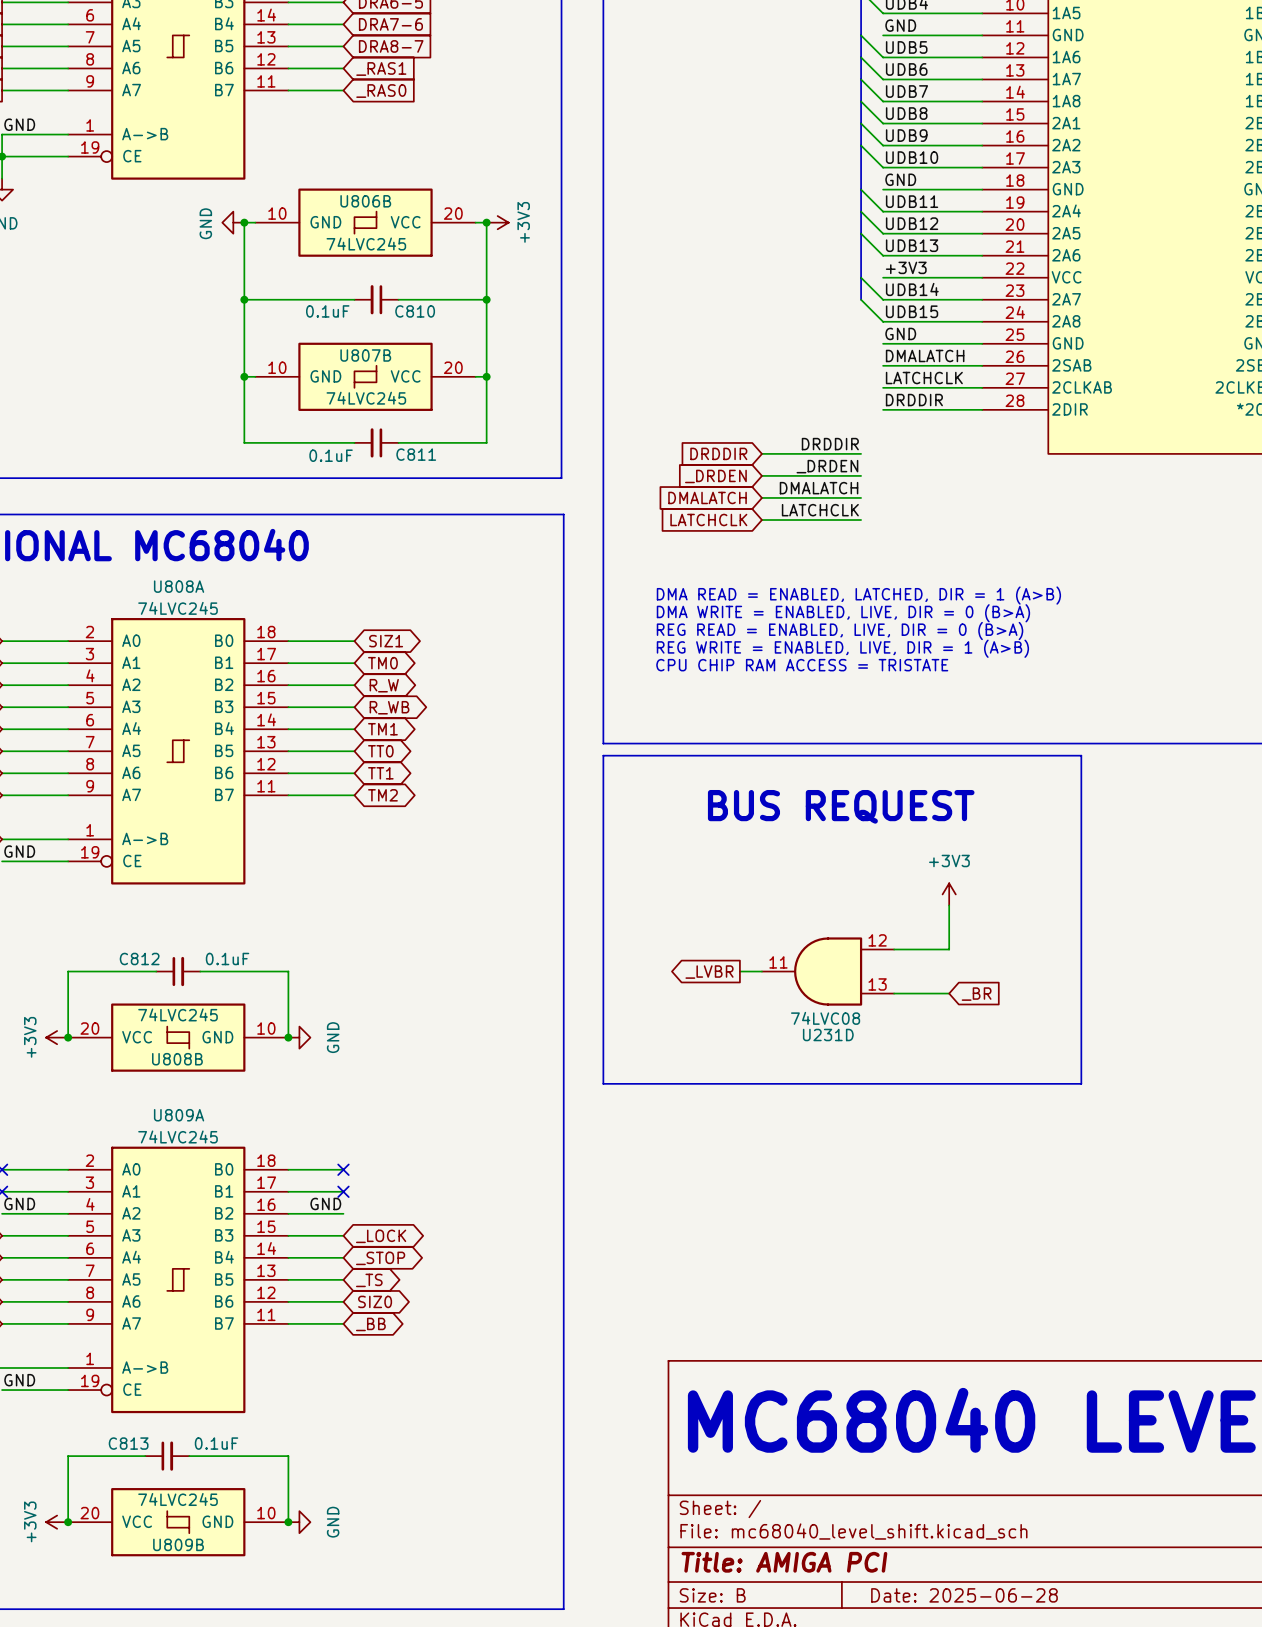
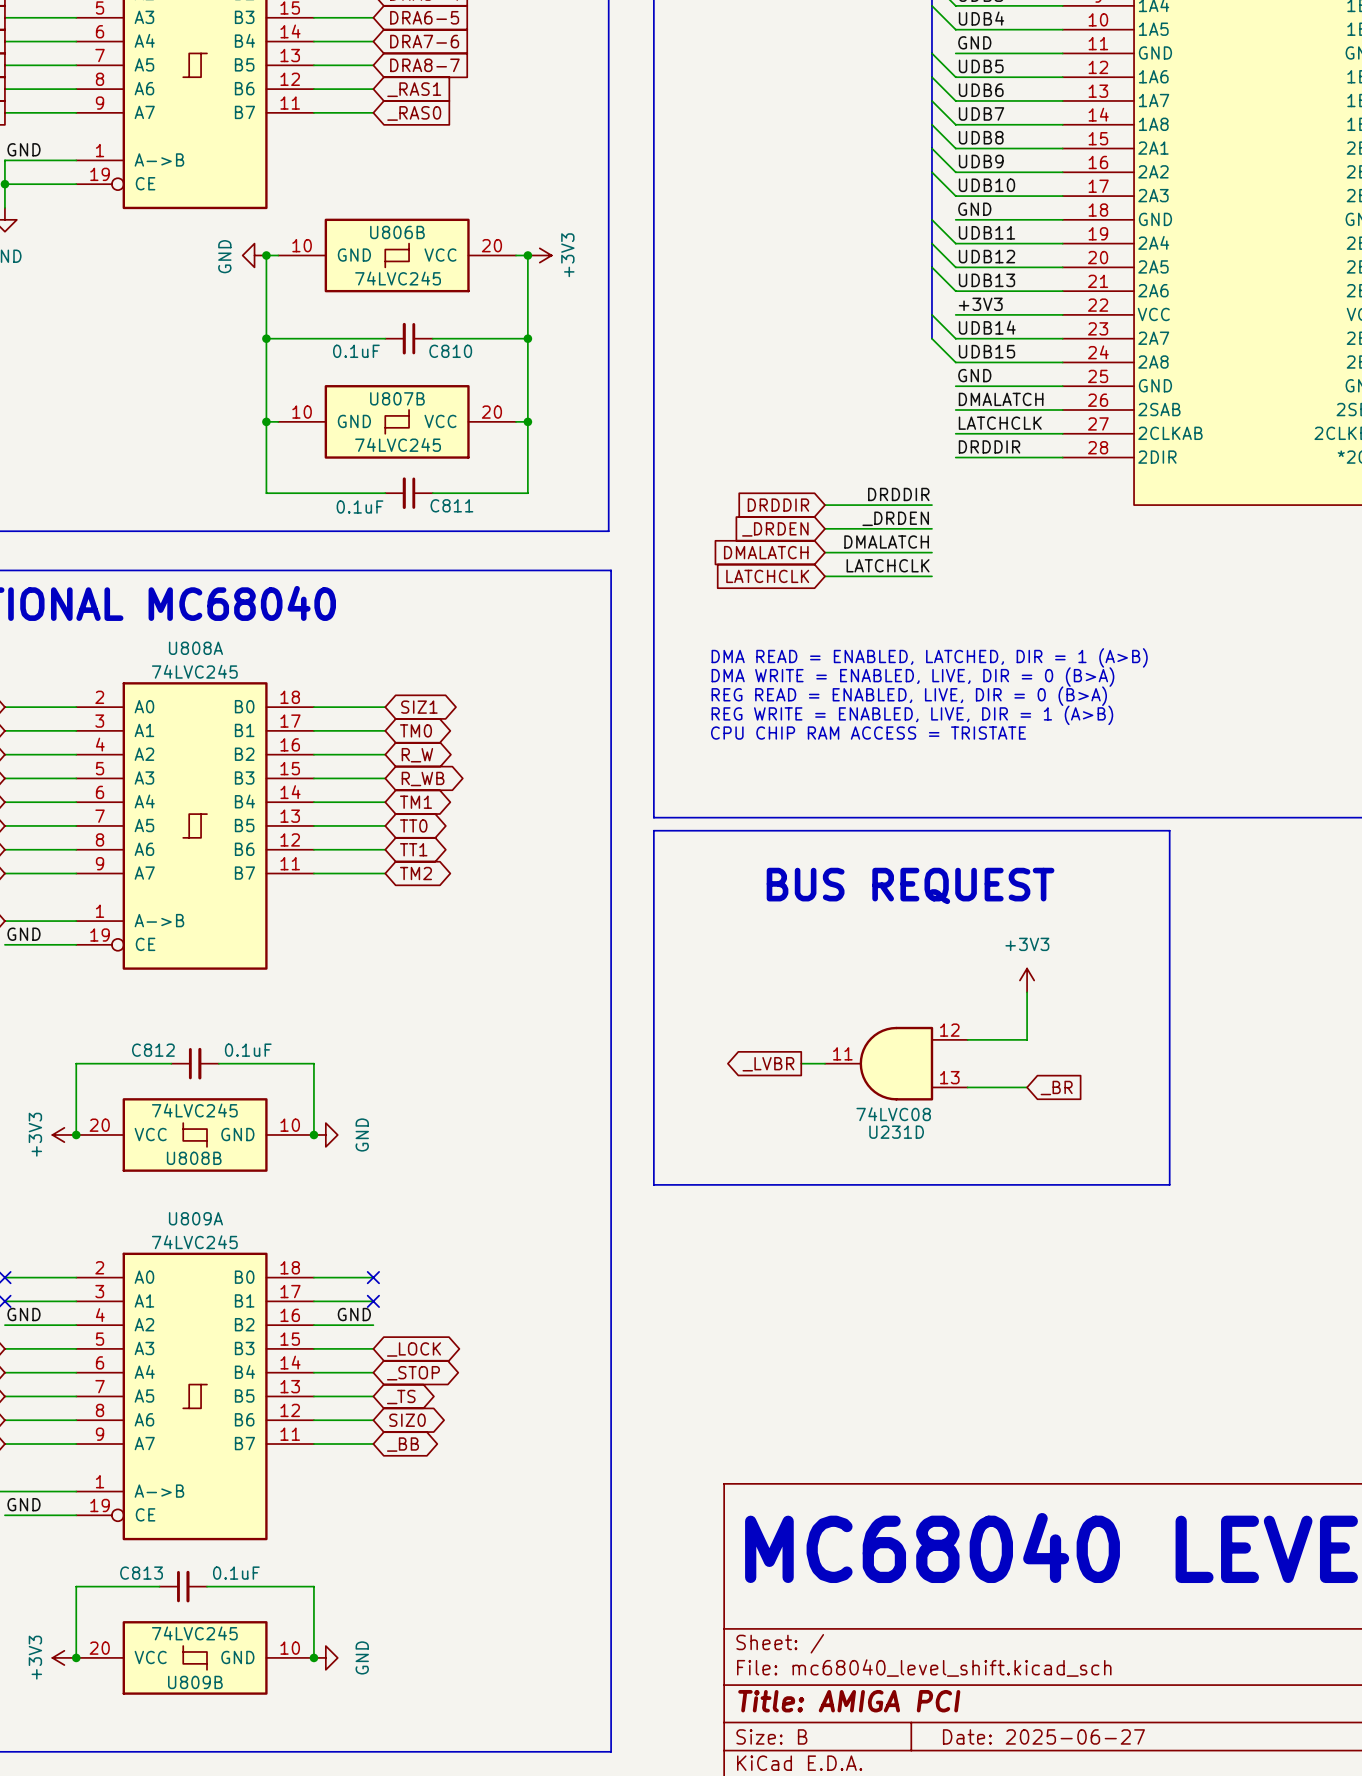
title block: Date: 2025-06-28 (964, 1595) -> Date: 2025-06-27 (1043, 1736)

